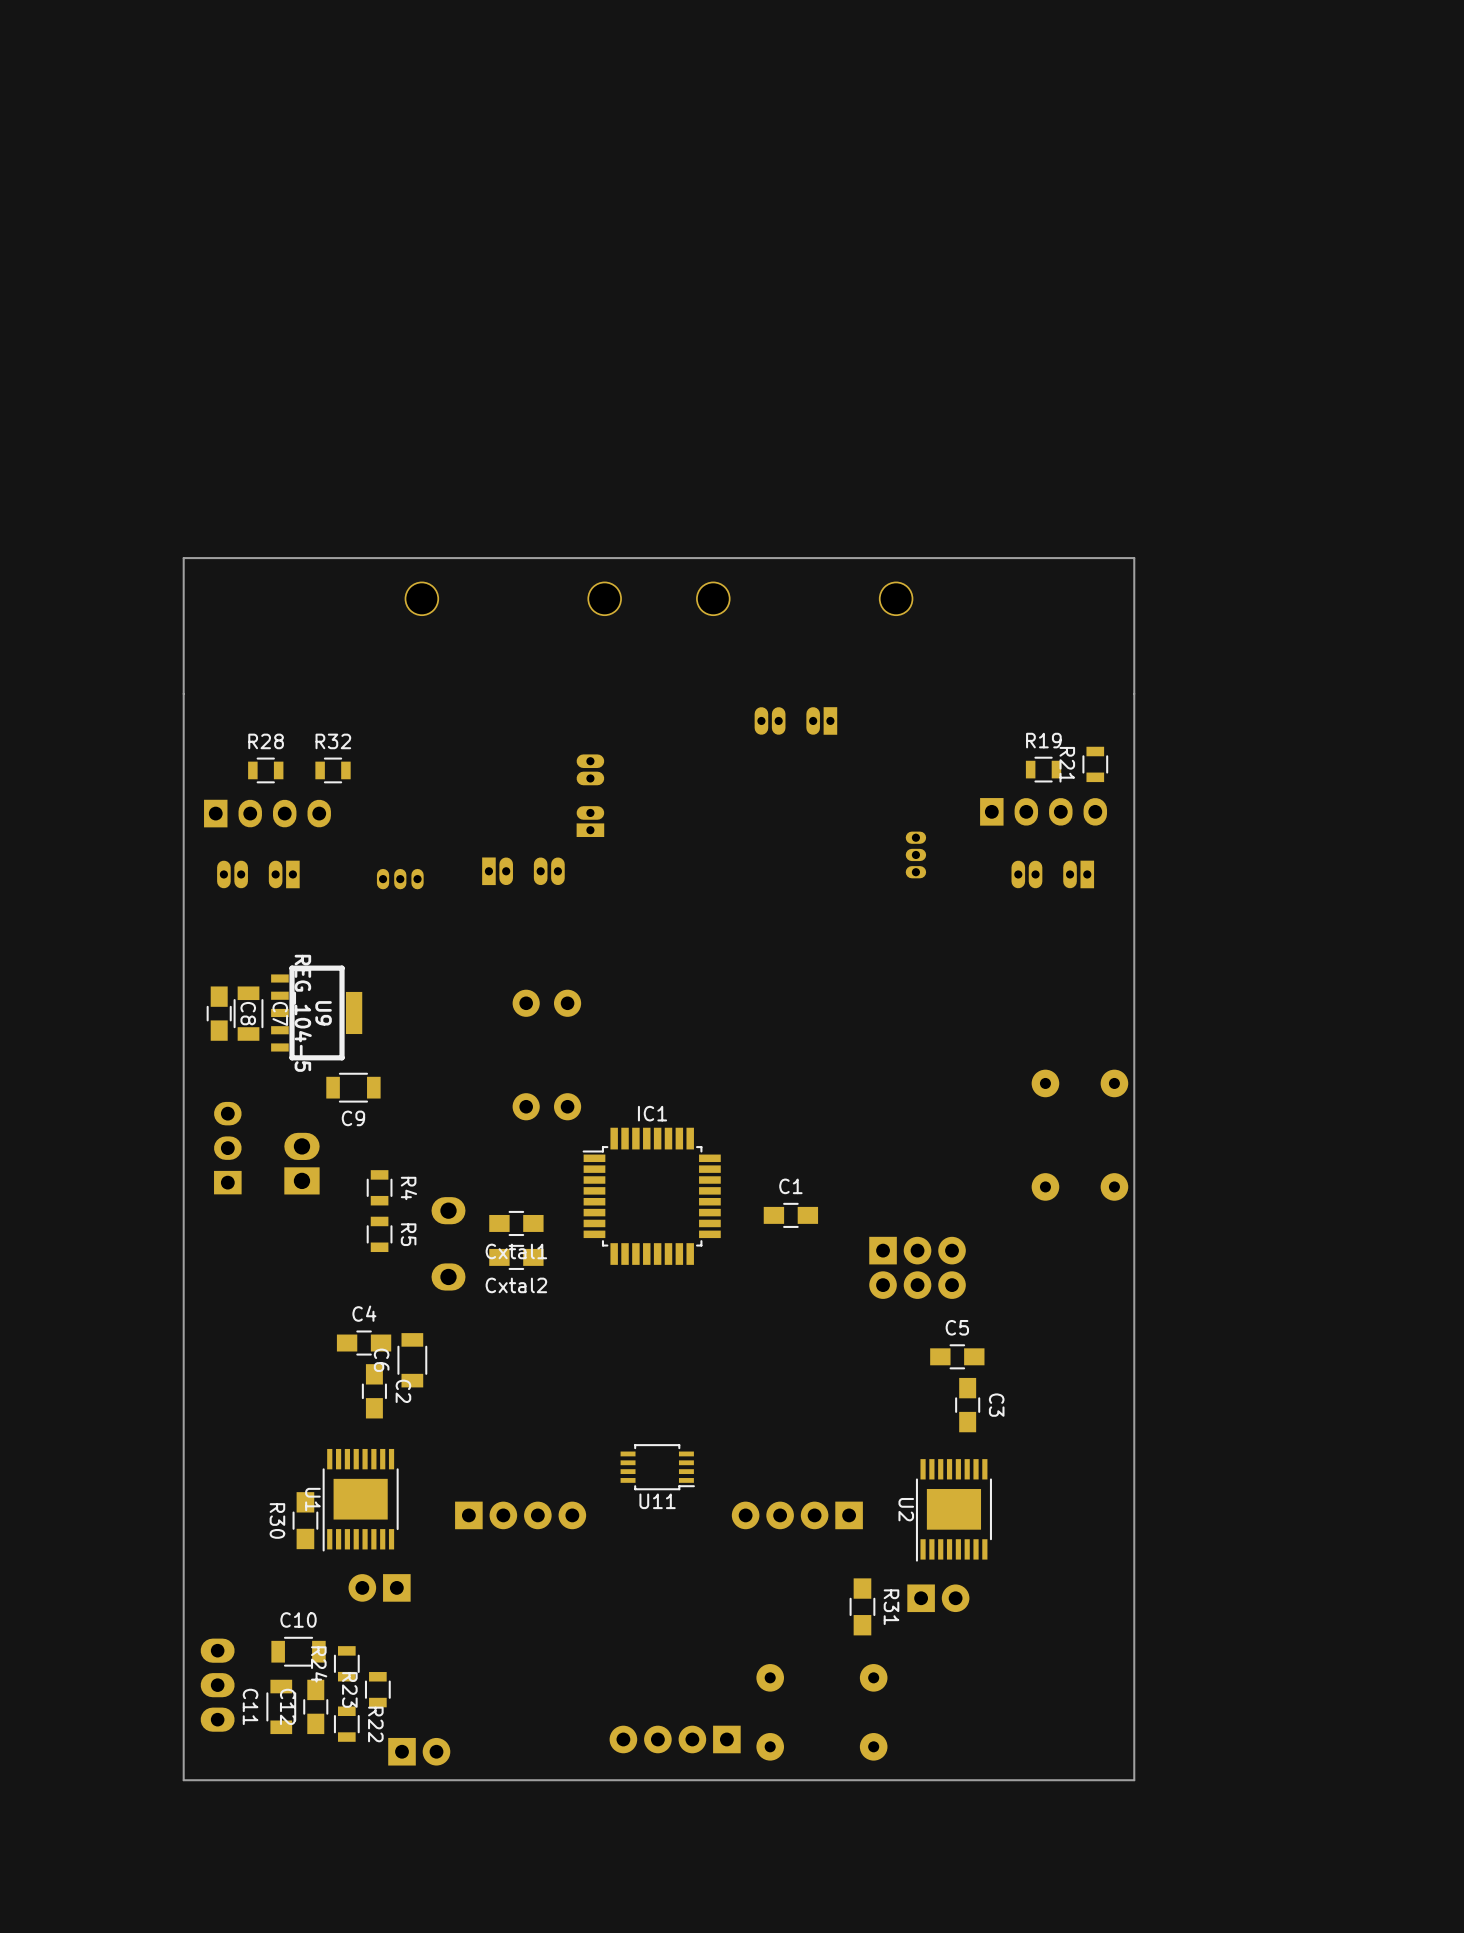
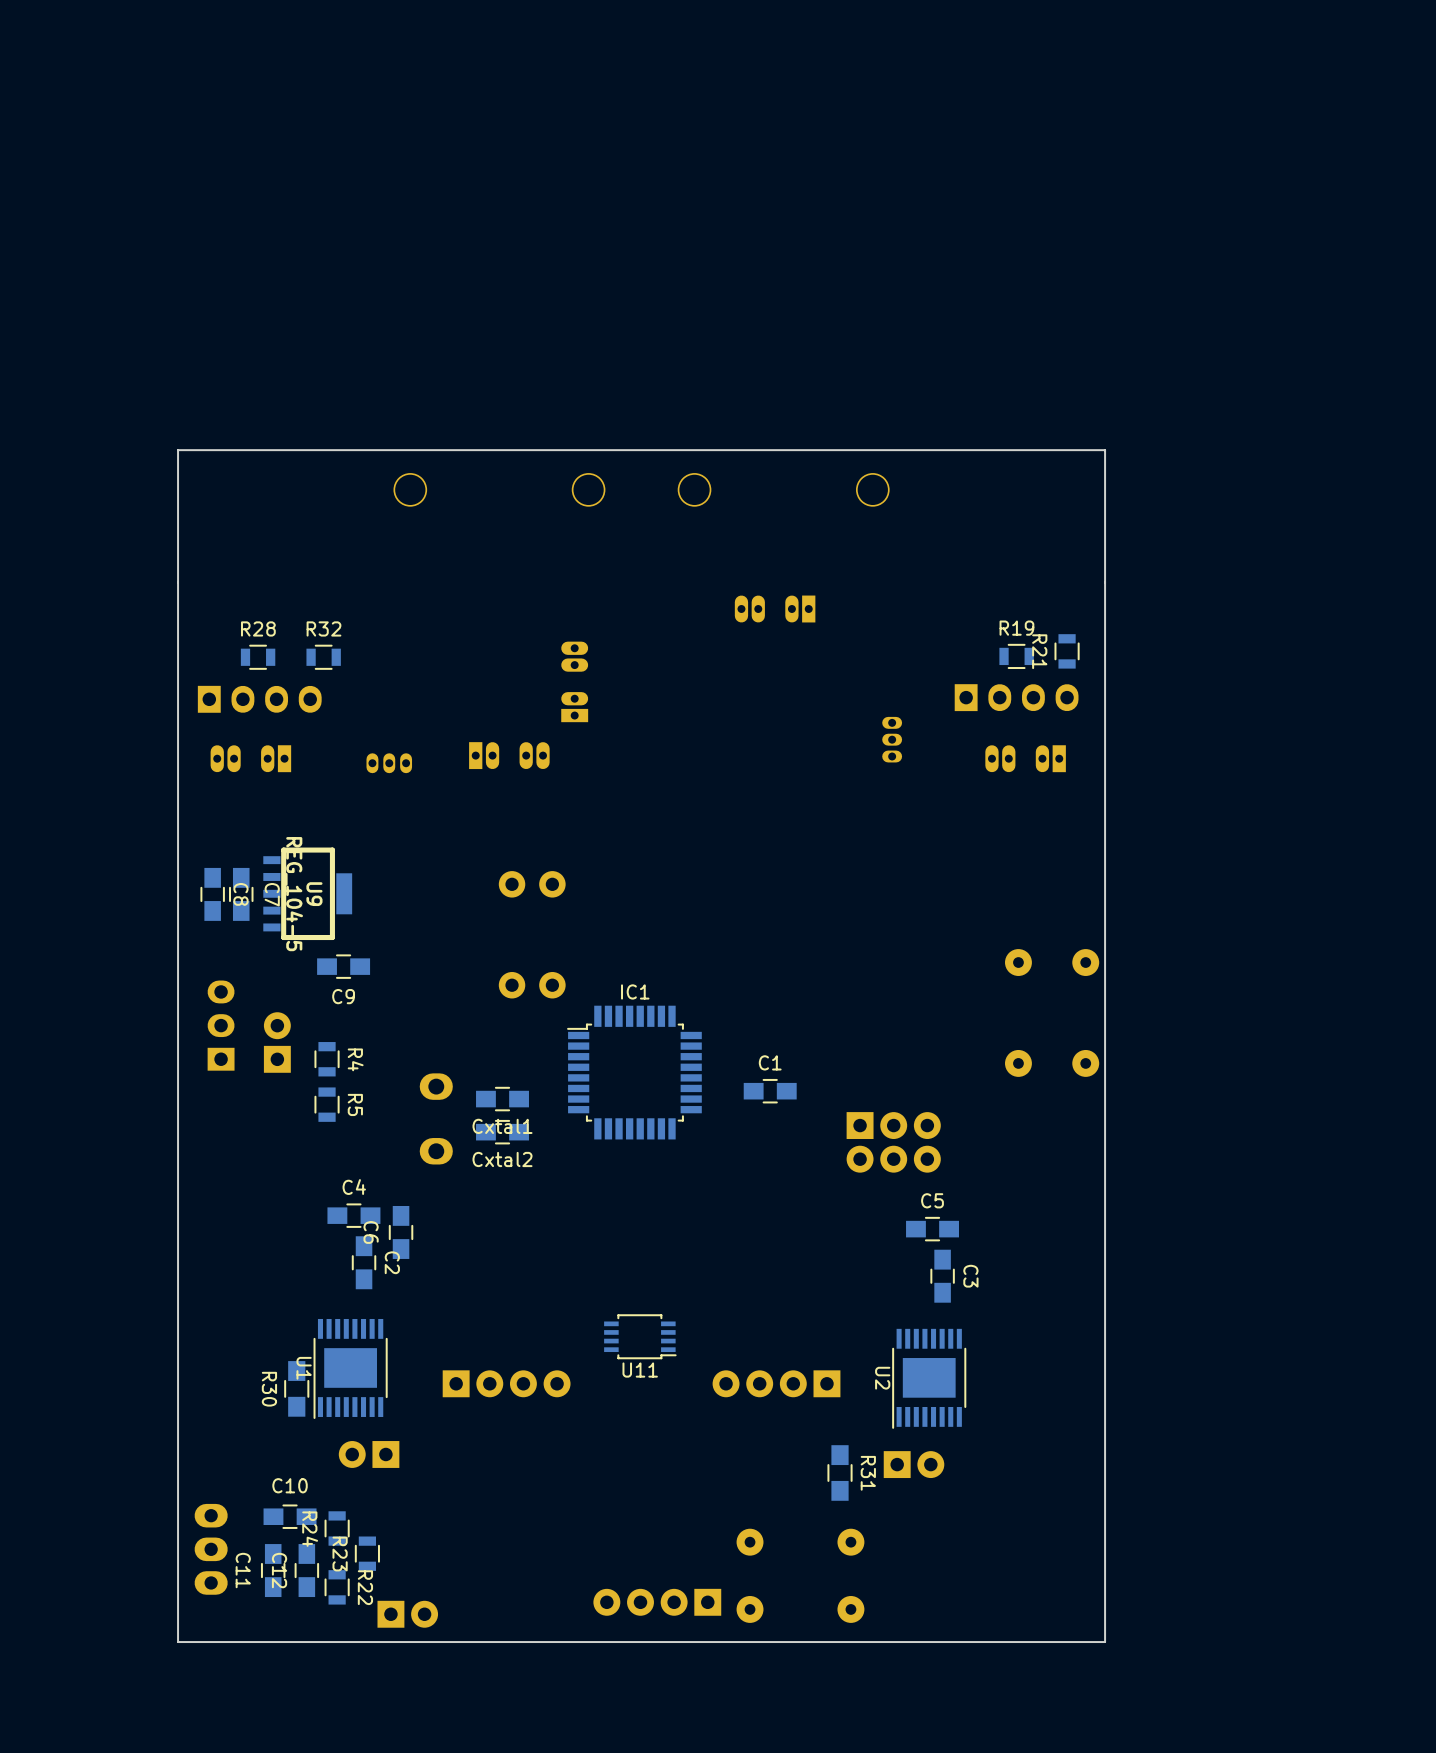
C7 footprint: [233, 986, 264, 1041] -> [229, 867, 254, 921]
C9 footprint: [326, 1072, 381, 1103] -> [317, 954, 371, 979]
part: (301, 1163) -> none
part: none -> (277, 1042)
R4 position: (379, 1187) -> (327, 1059)
R5 position: (379, 1234) -> (327, 1104)
C6 footprint: [397, 1333, 428, 1388] -> [388, 1205, 414, 1259]
C10 footprint: [271, 1636, 326, 1667] -> [263, 1504, 317, 1529]
C11 footprint: [266, 1679, 297, 1735] -> [260, 1544, 286, 1598]

